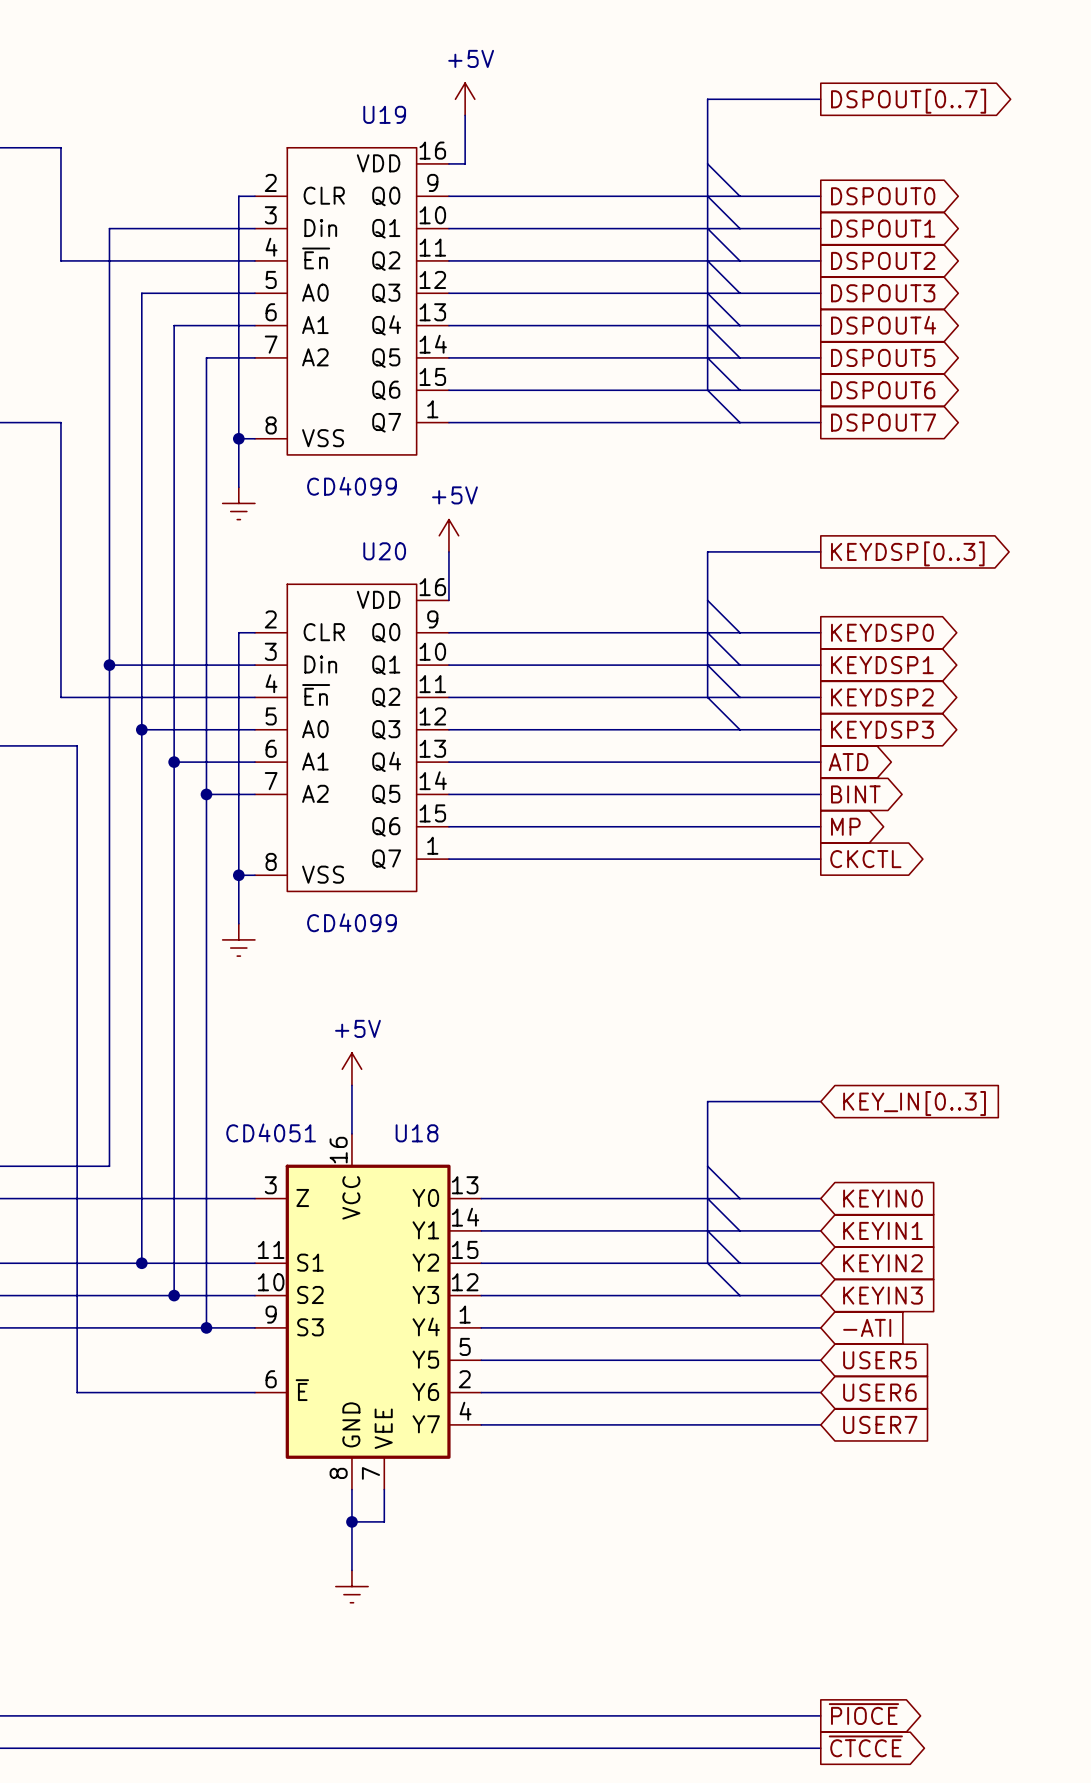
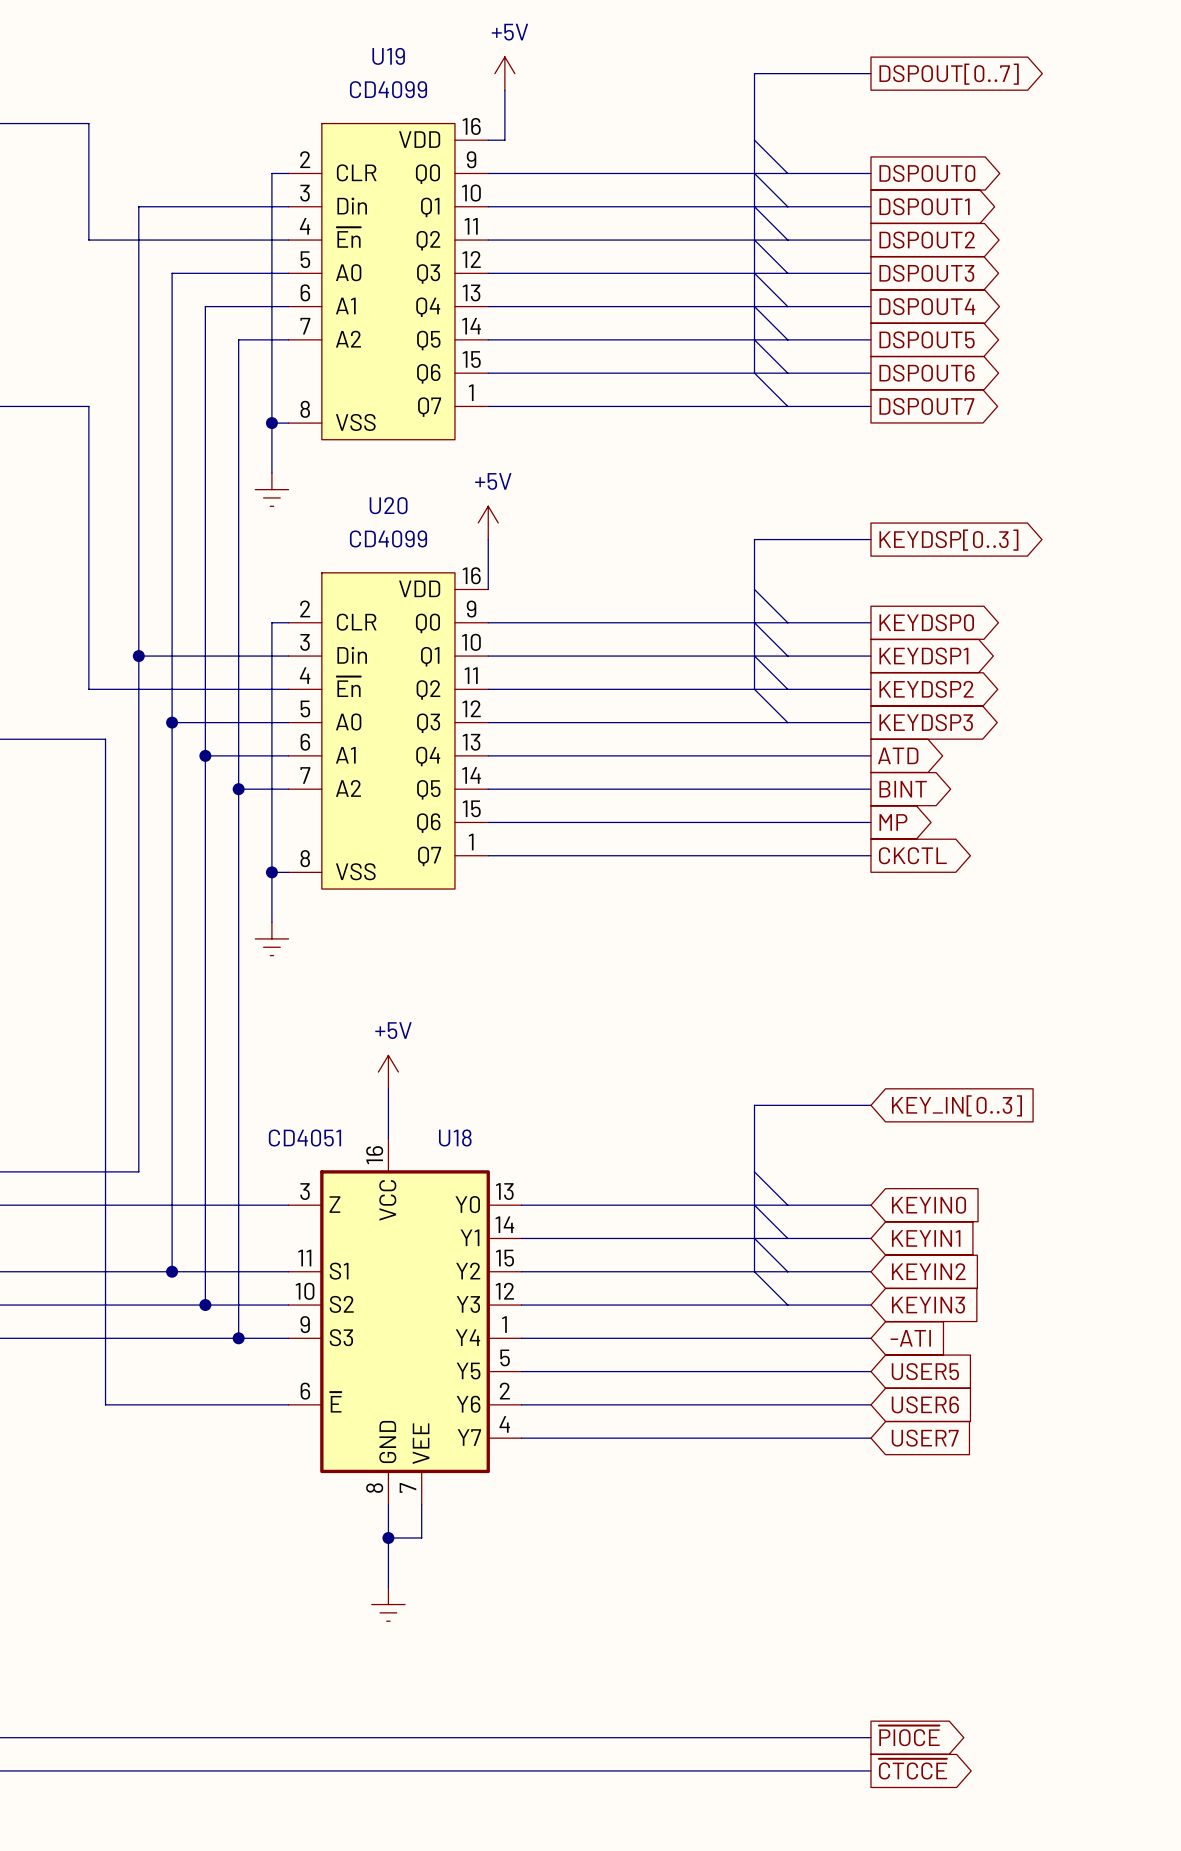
U19 name position: U19 (384, 114) -> U19 (388, 56)
U19 symbol: [254, 147, 449, 455] -> [288, 123, 489, 440]
U19 value position: CD4099 (351, 486) -> CD4099 (388, 89)
U20 name position: U20 (384, 551) -> U20 (388, 505)
U20 symbol: [254, 584, 449, 892] -> [288, 572, 489, 890]
U20 value position: CD4099 (351, 922) -> CD4099 (388, 538)

